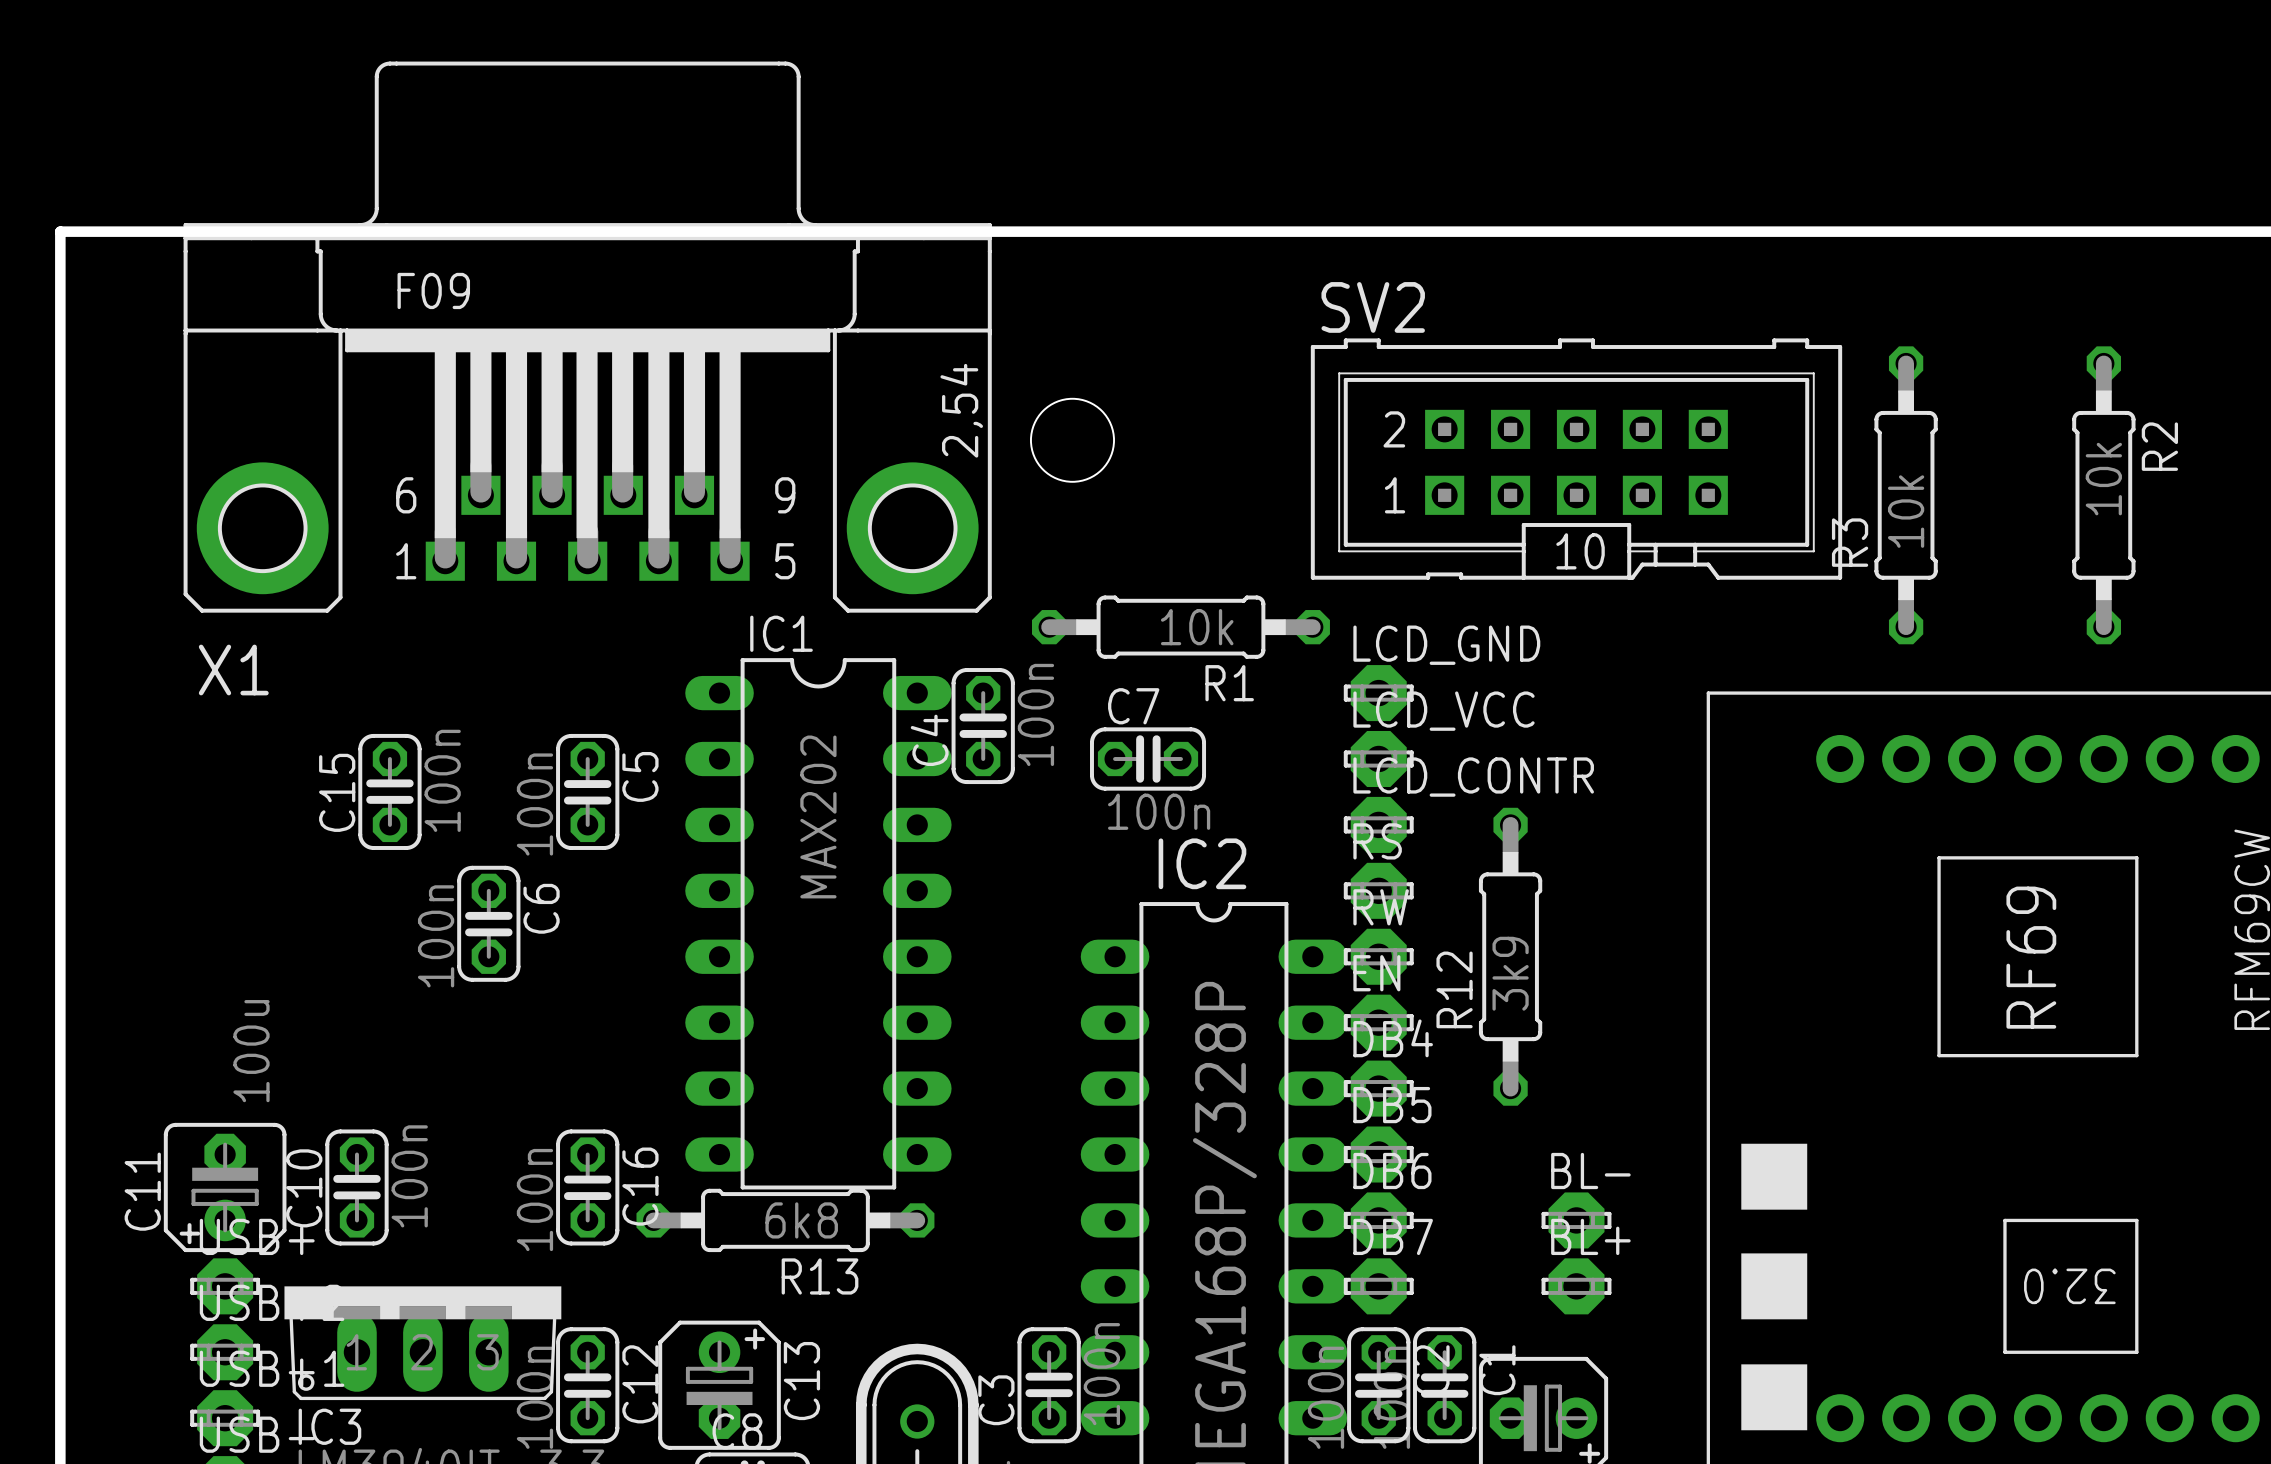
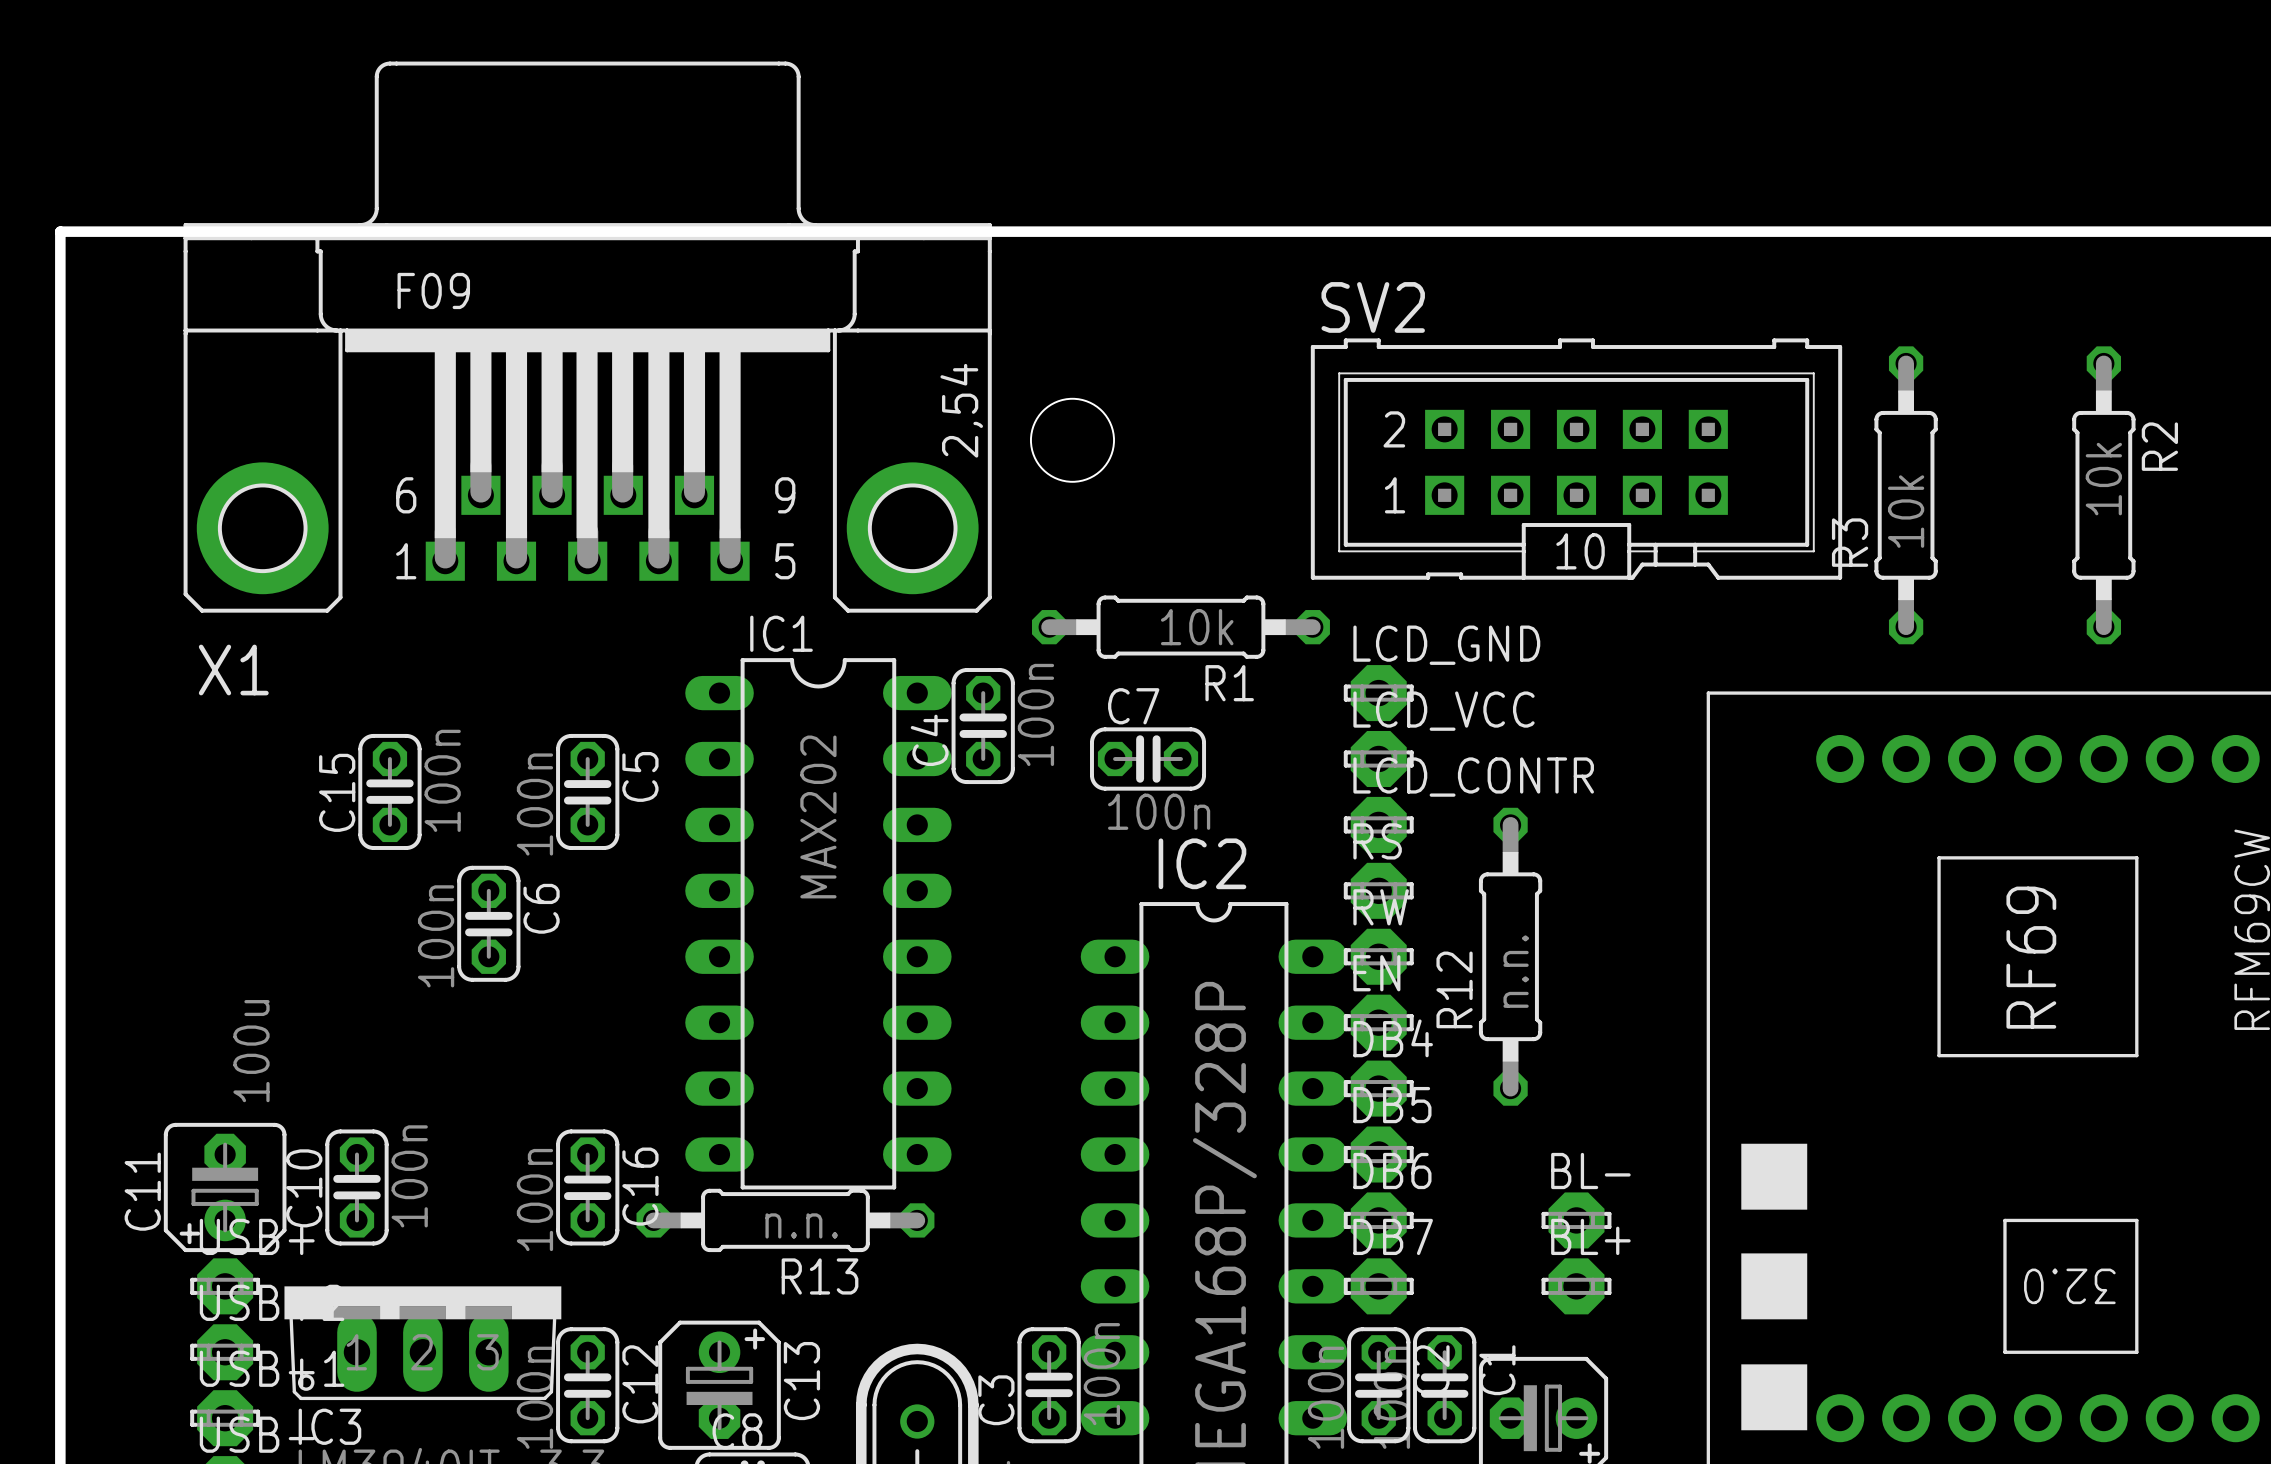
R12 value: 3k9 (1510, 973) -> n.n. (1516, 971)
R13 value: 6k8 (801, 1220) -> n.n. (801, 1225)

